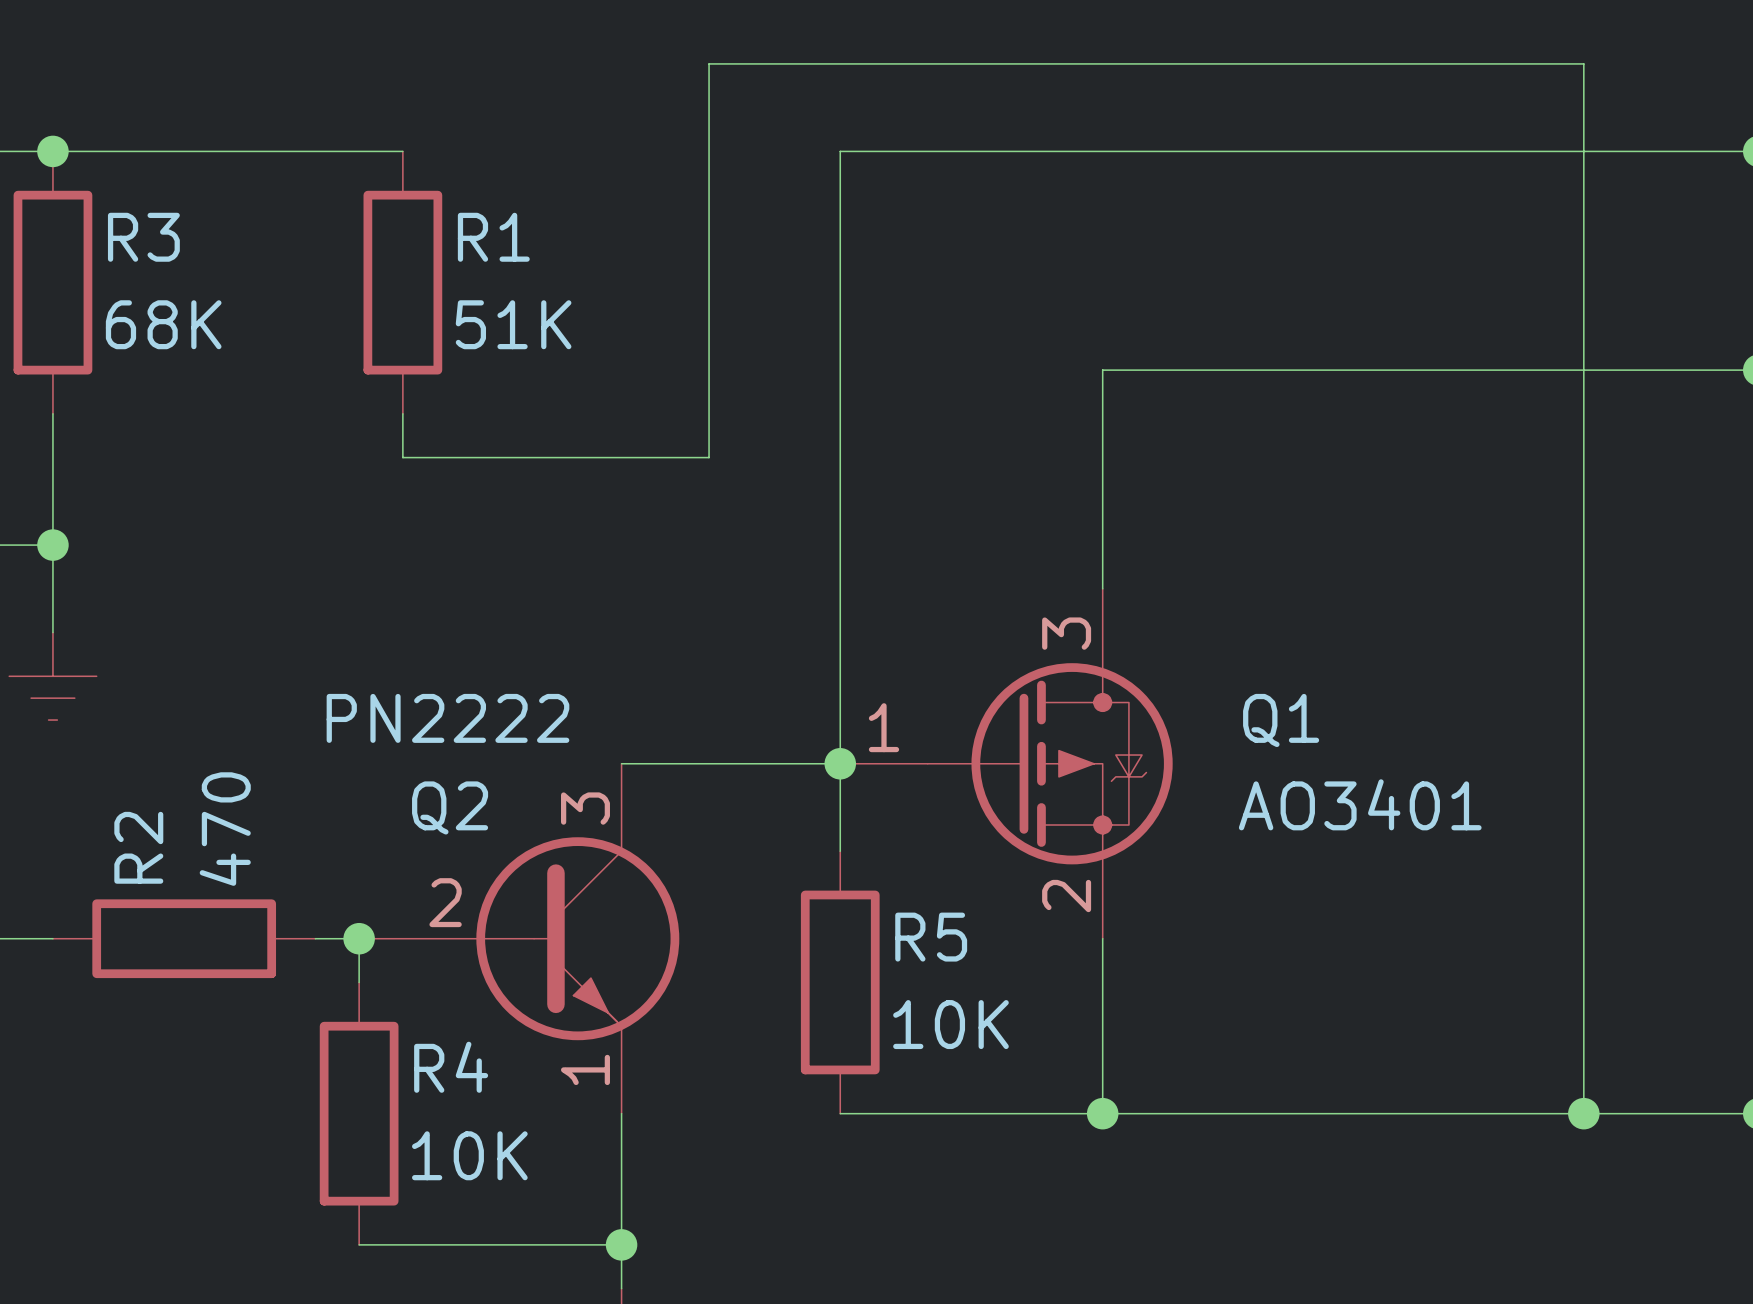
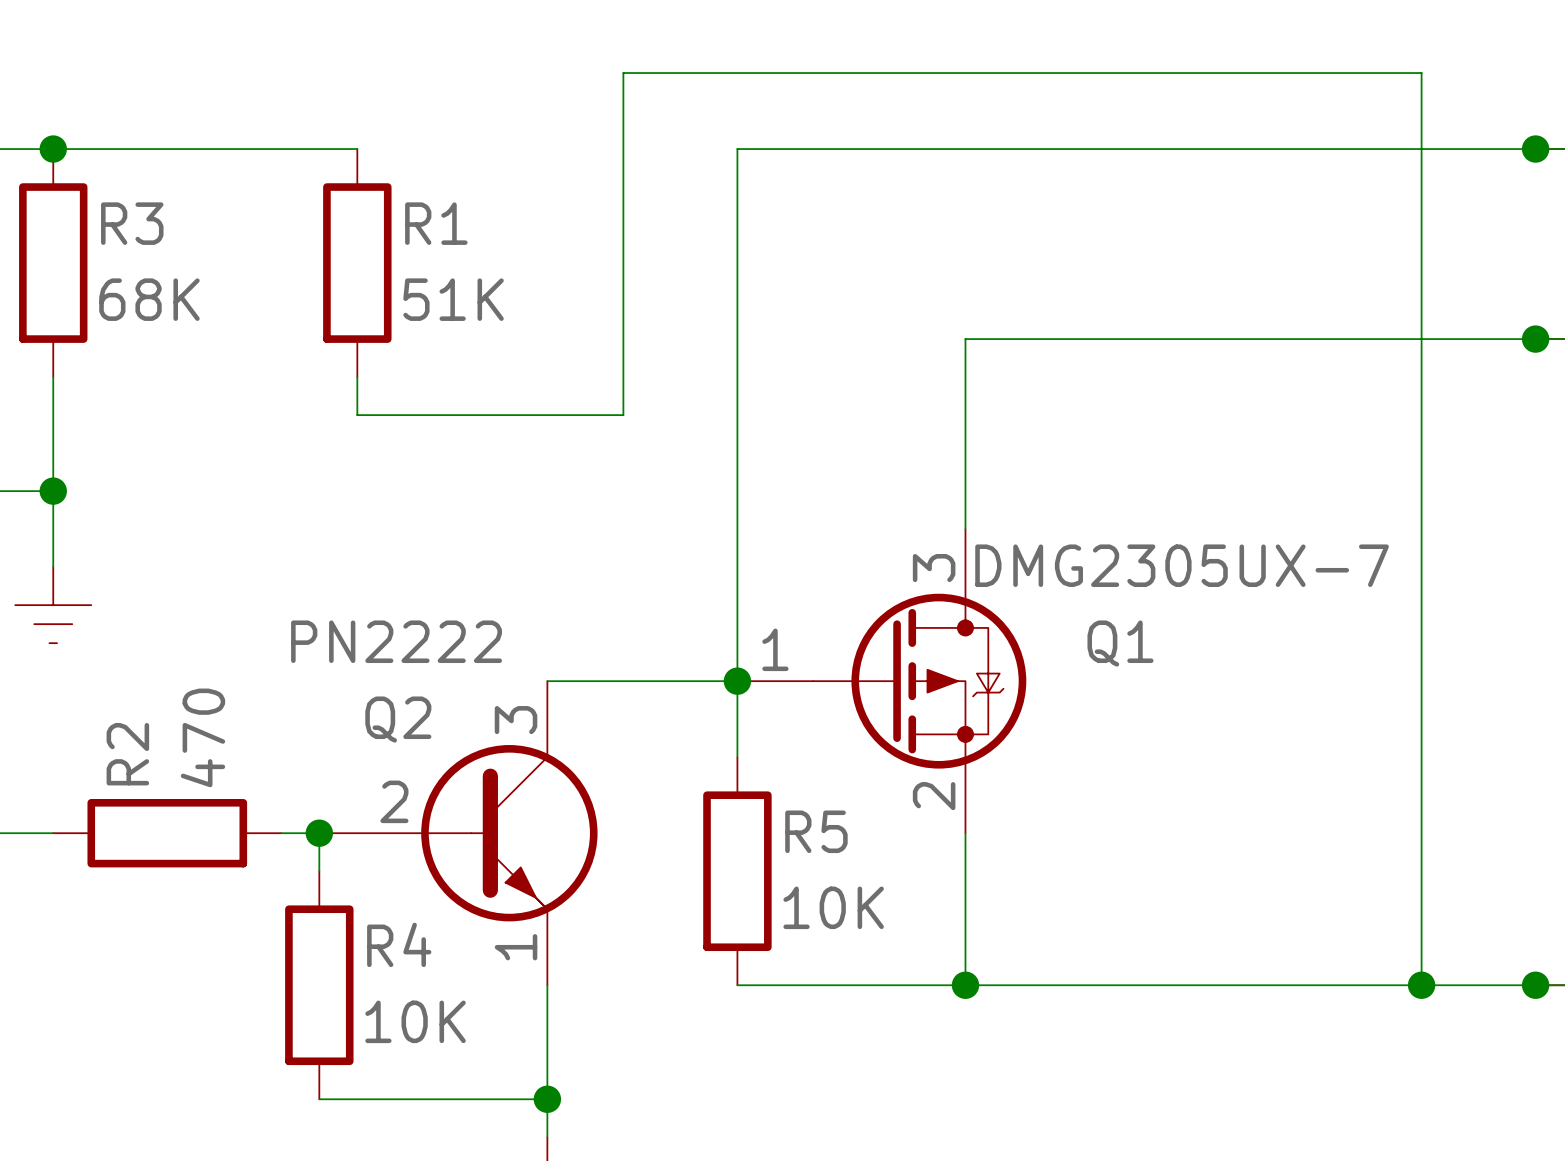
wire: (1583, 63) (1583, 1113) -> (1383, 73) (1421, 73) (1421, 985)
Q1 value: AO3401 (1360, 804) -> DMG2305UX-7 (1182, 565)
junction position: (1583, 1113) -> (1421, 985)

